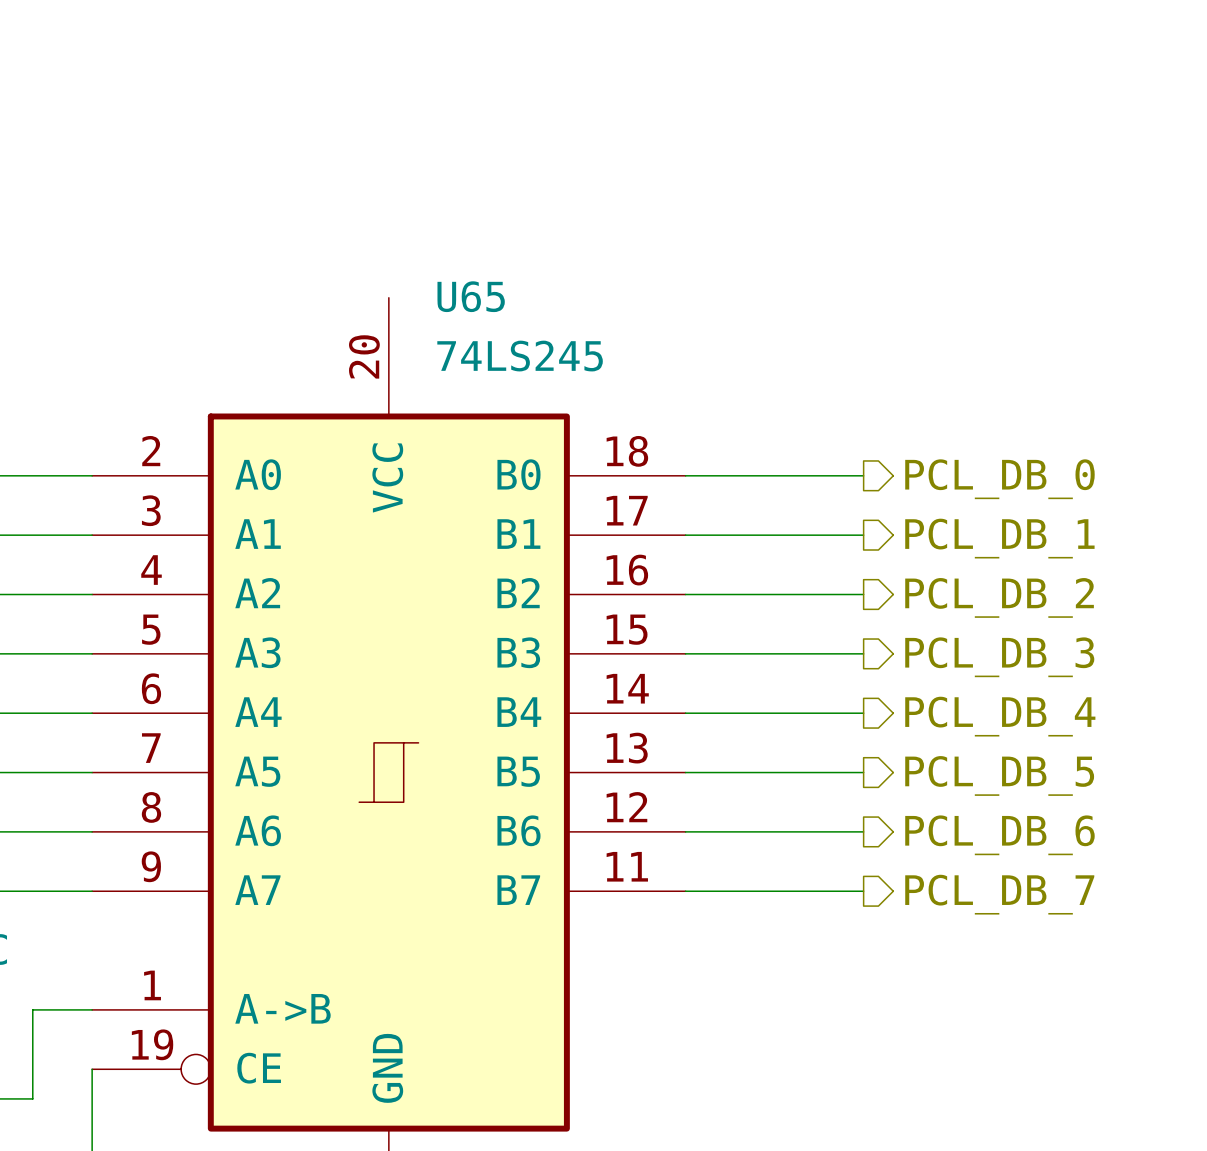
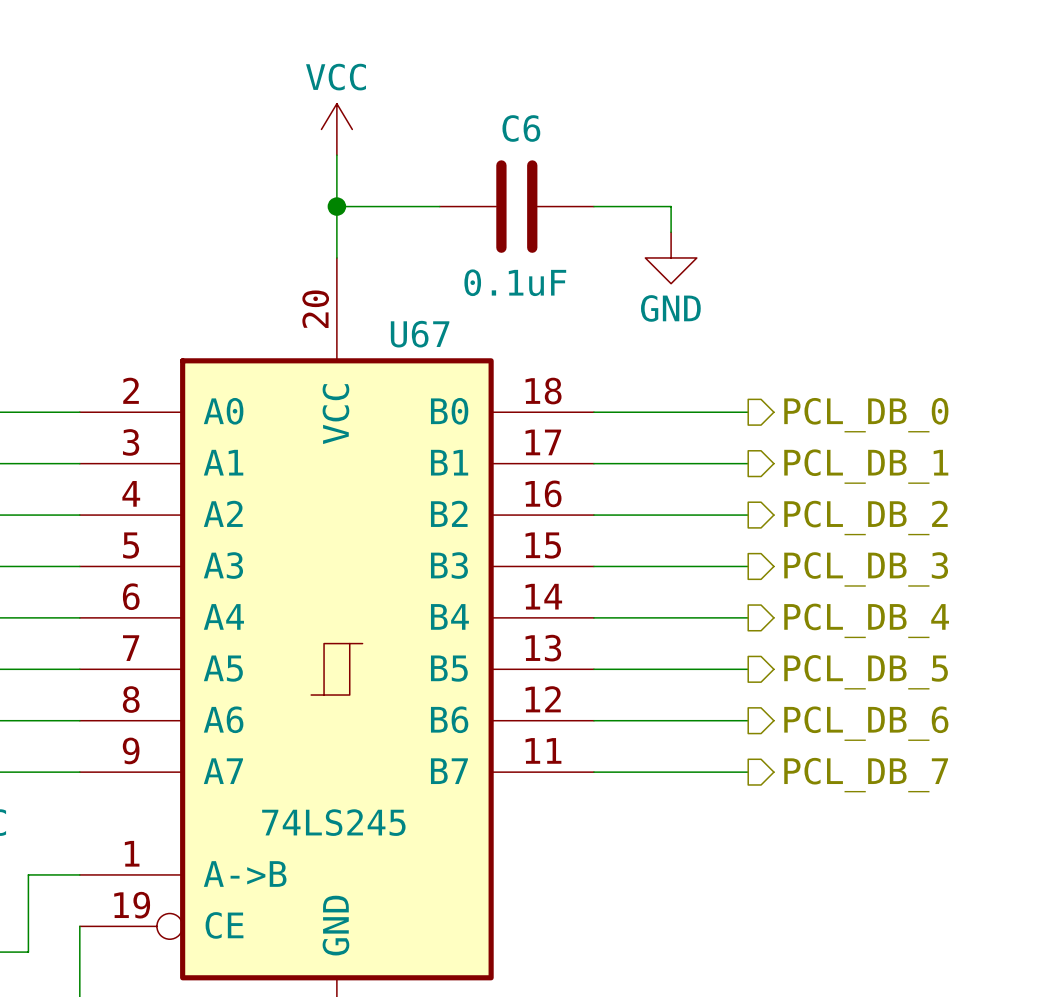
power symbol: none -> VCC (336, 129)
wire: none -> (336, 155) (336, 257)
wire: none -> (336, 206) (439, 206)
junction: none -> (336, 206)
C6: none -> 0.1uF (516, 206)
wire: none -> (593, 206) (671, 206) (671, 232)
U65 name: U65 (471, 296) -> U67 (420, 334)
power symbol: none -> GND (671, 257)
U65 value position: 74LS245 (520, 356) -> 74LS245 (333, 822)

